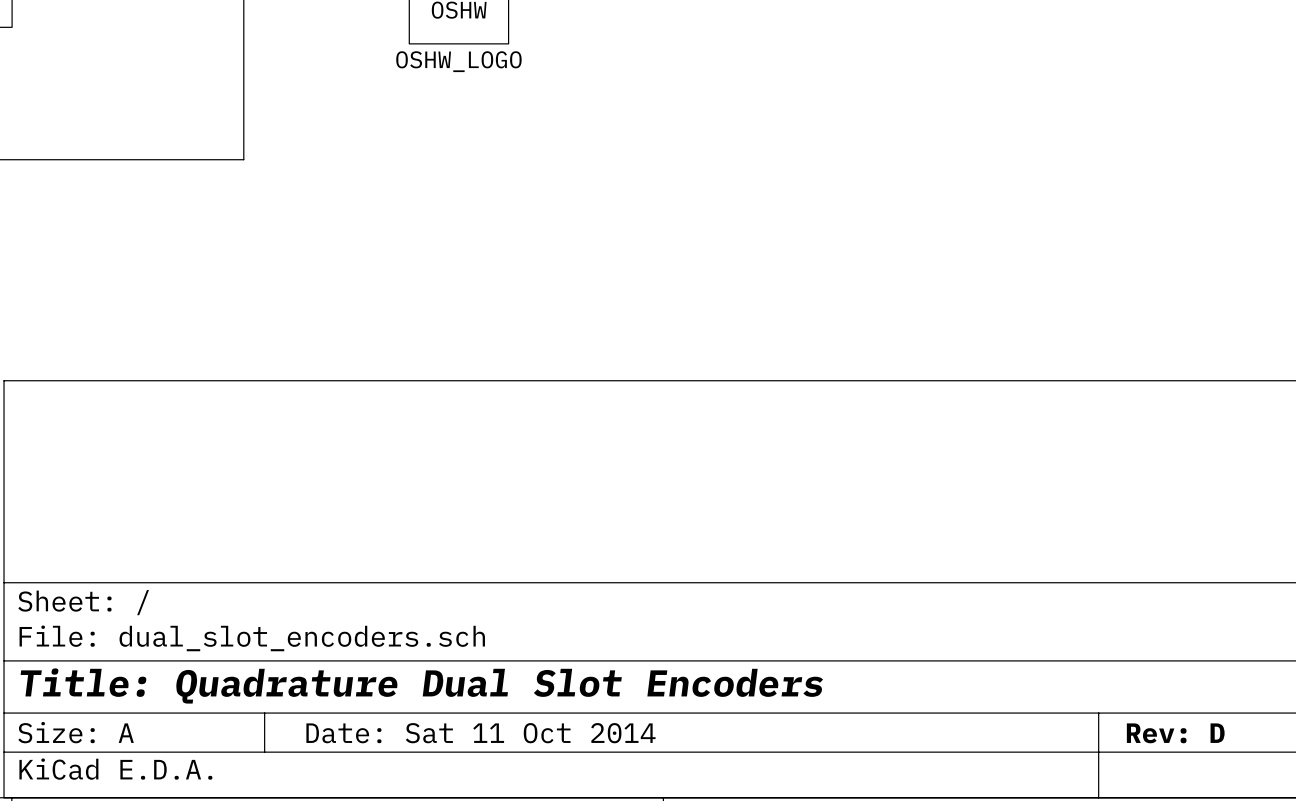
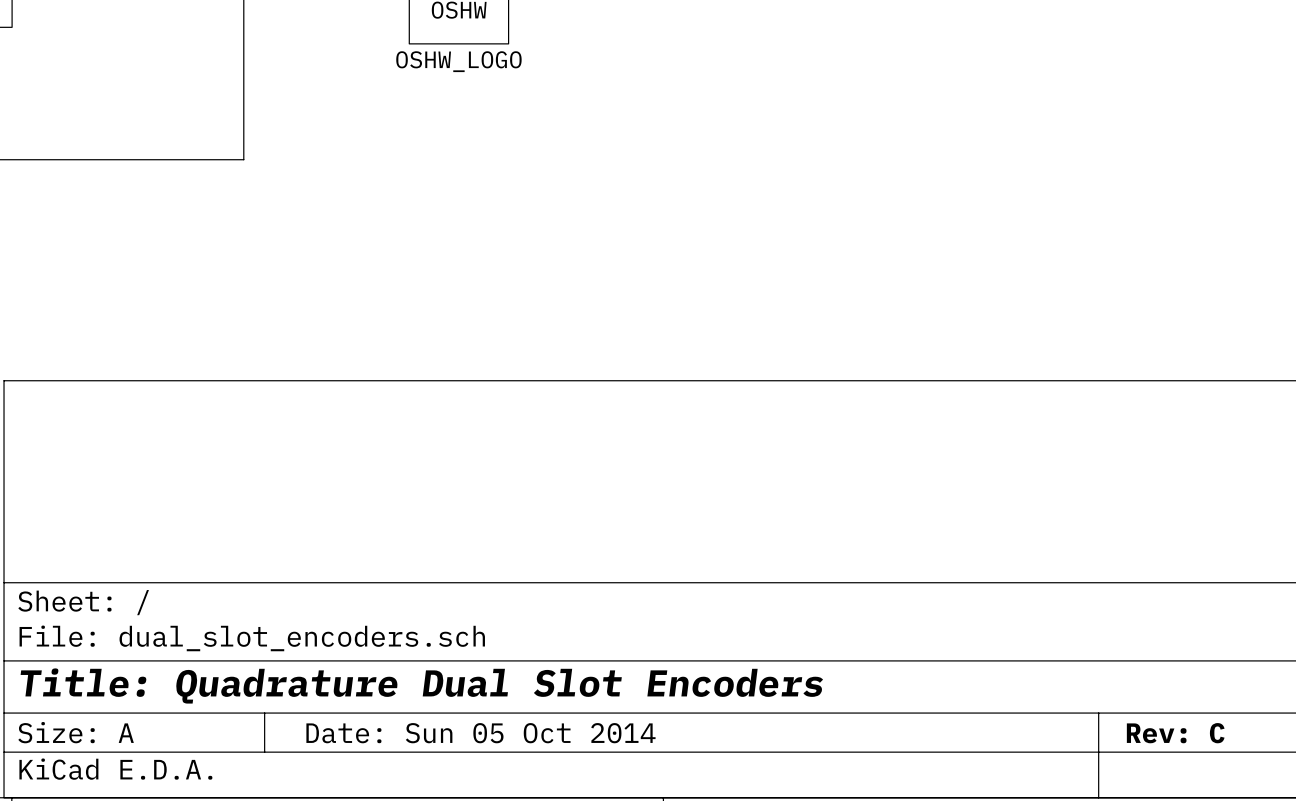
title block: Date: Sat 11 Oct 2014 (480, 733) -> Date: Sun 05 Oct 2014 (480, 733)
title block: Rev: D (1175, 733) -> Rev: C (1175, 733)

